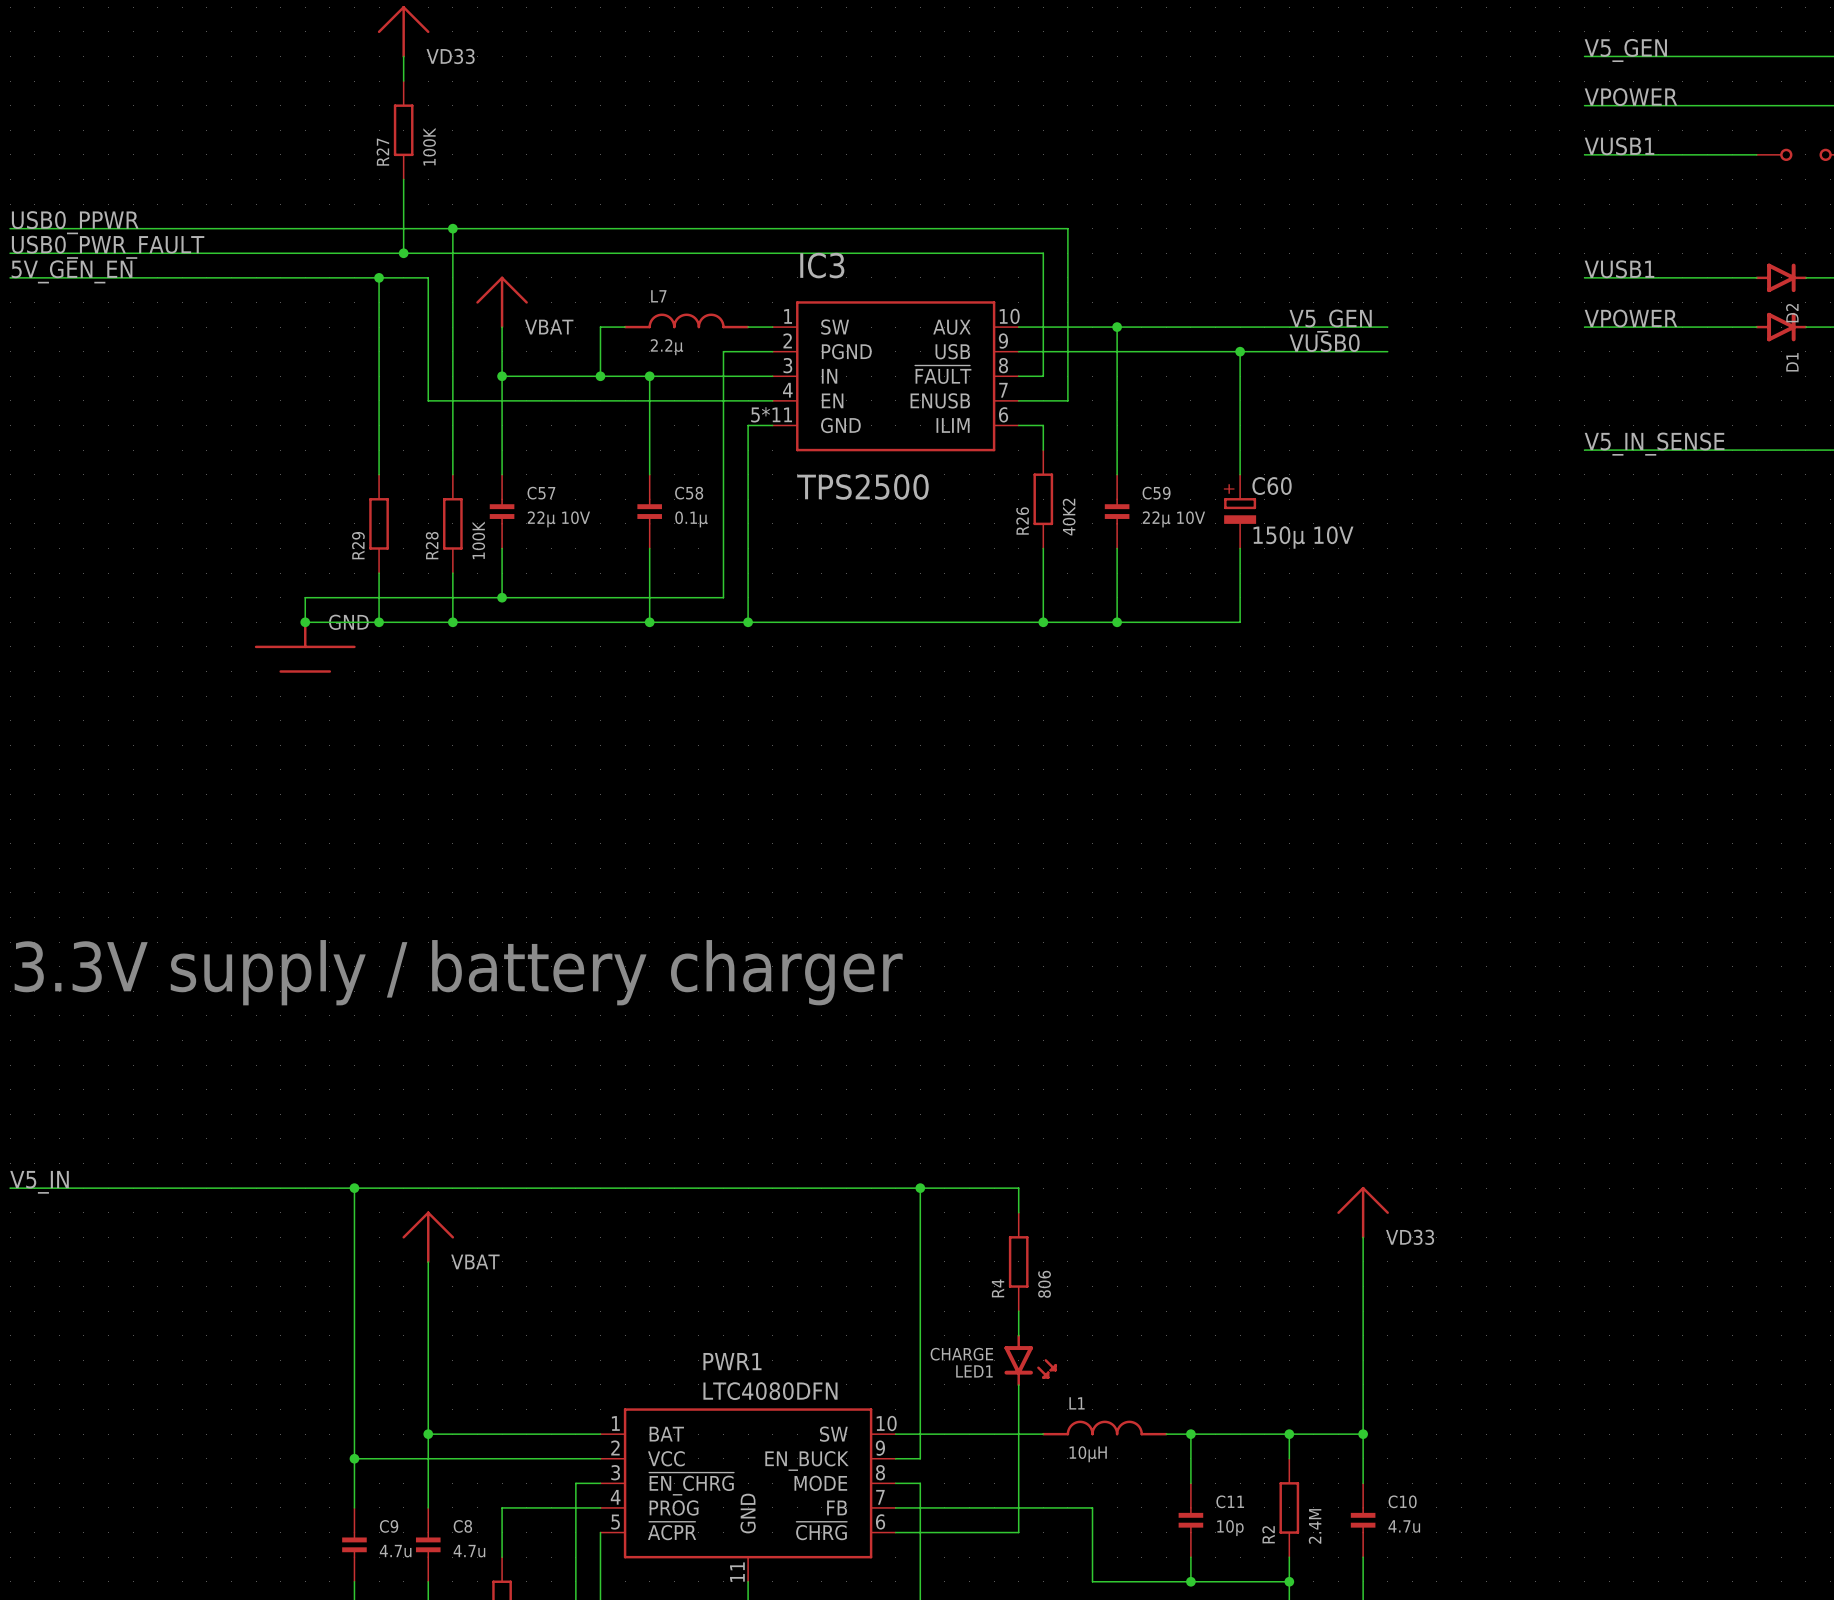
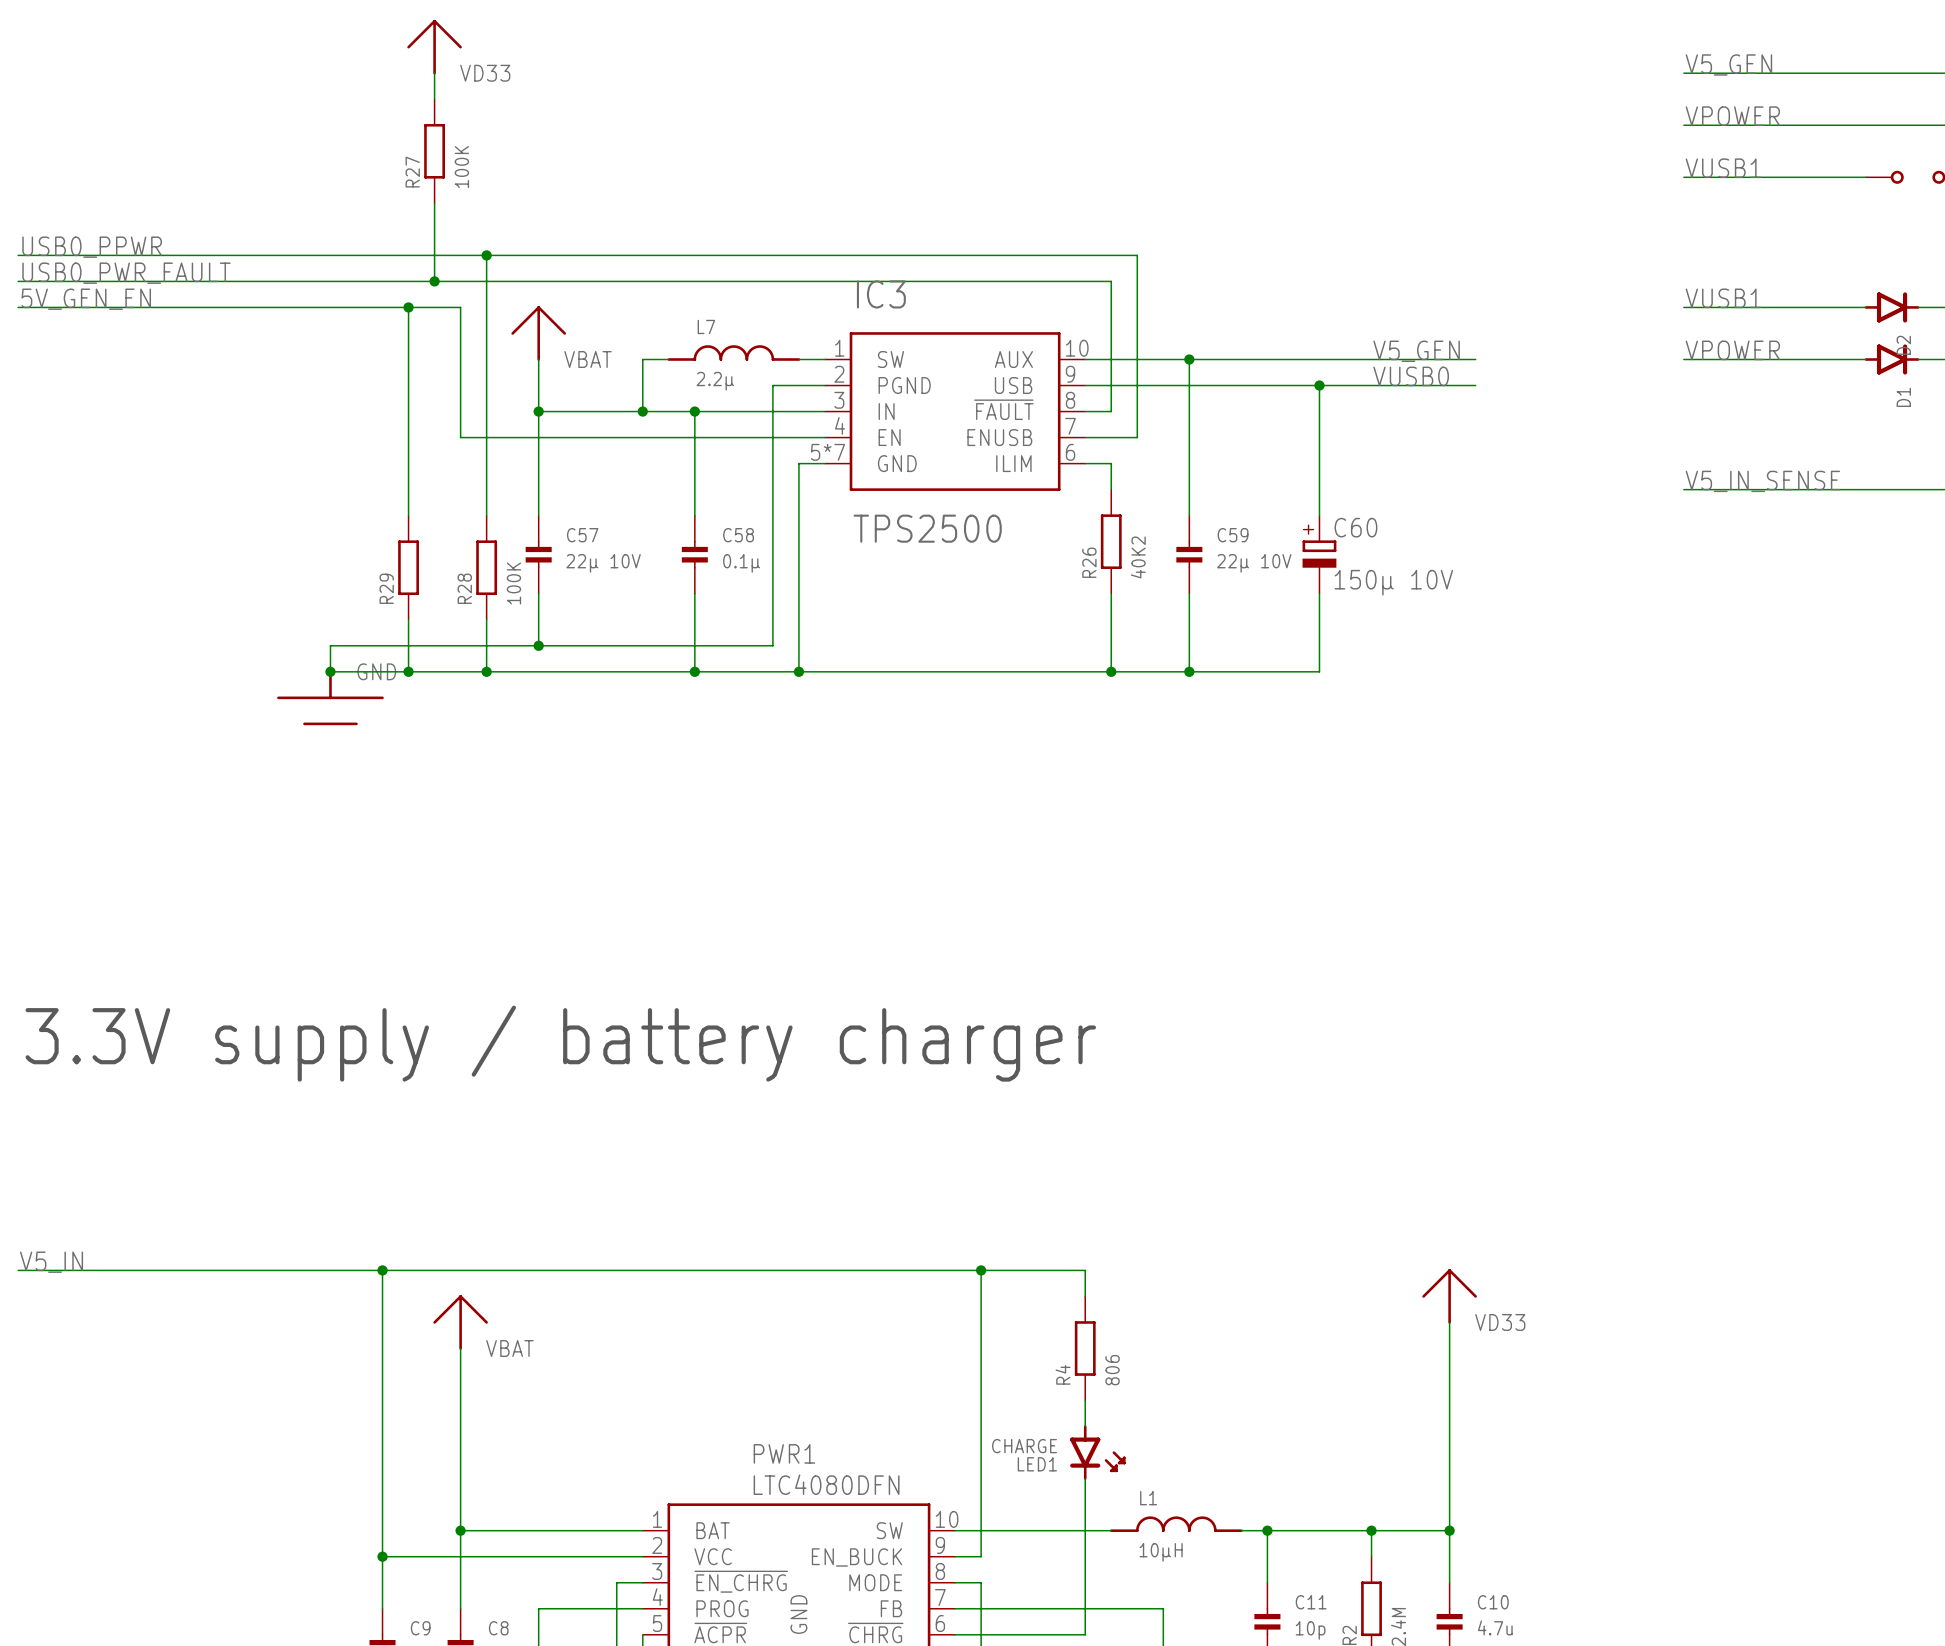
IC3 pin number: 5*11 (771, 414) -> 5*7 (827, 452)

